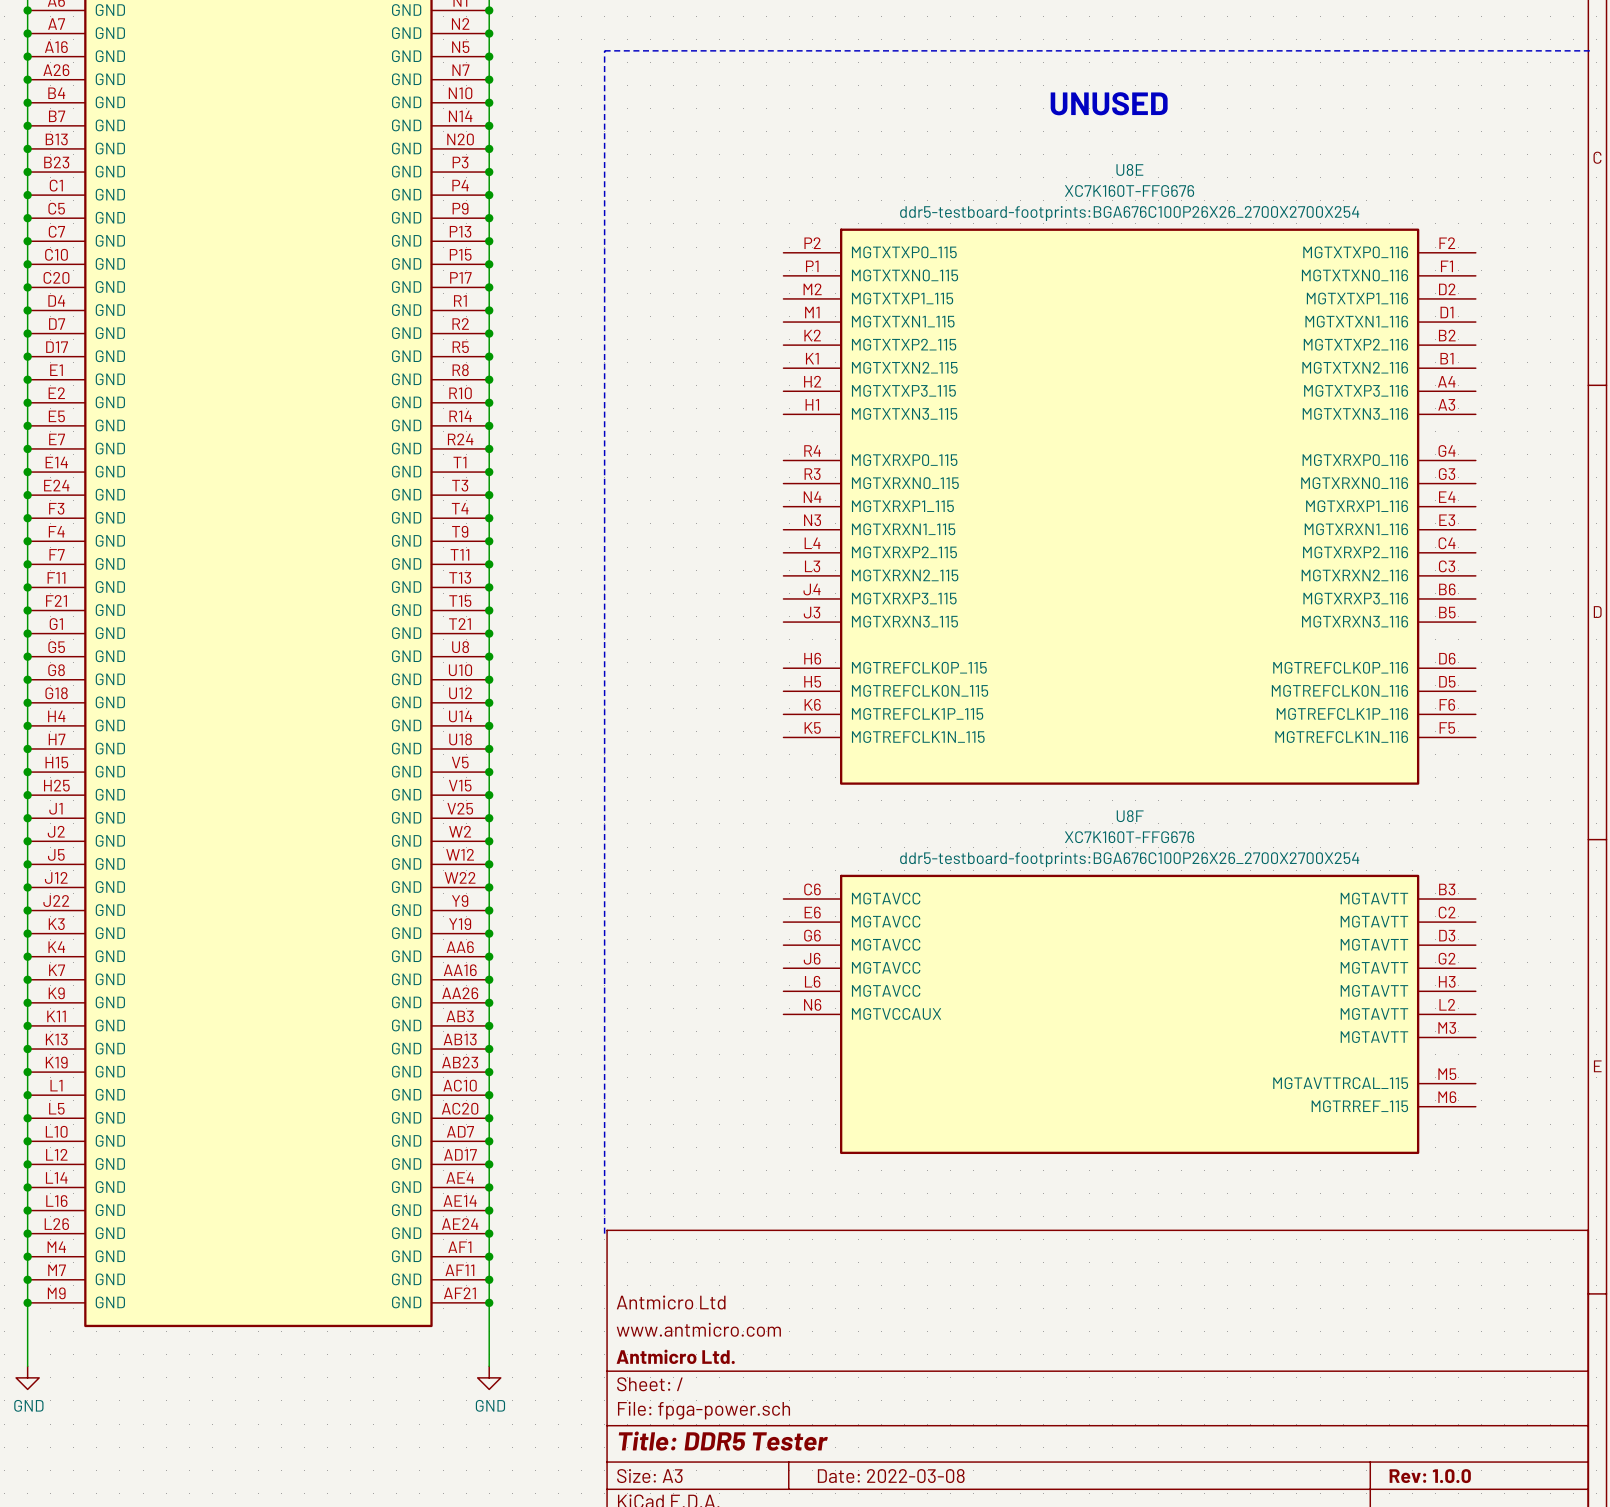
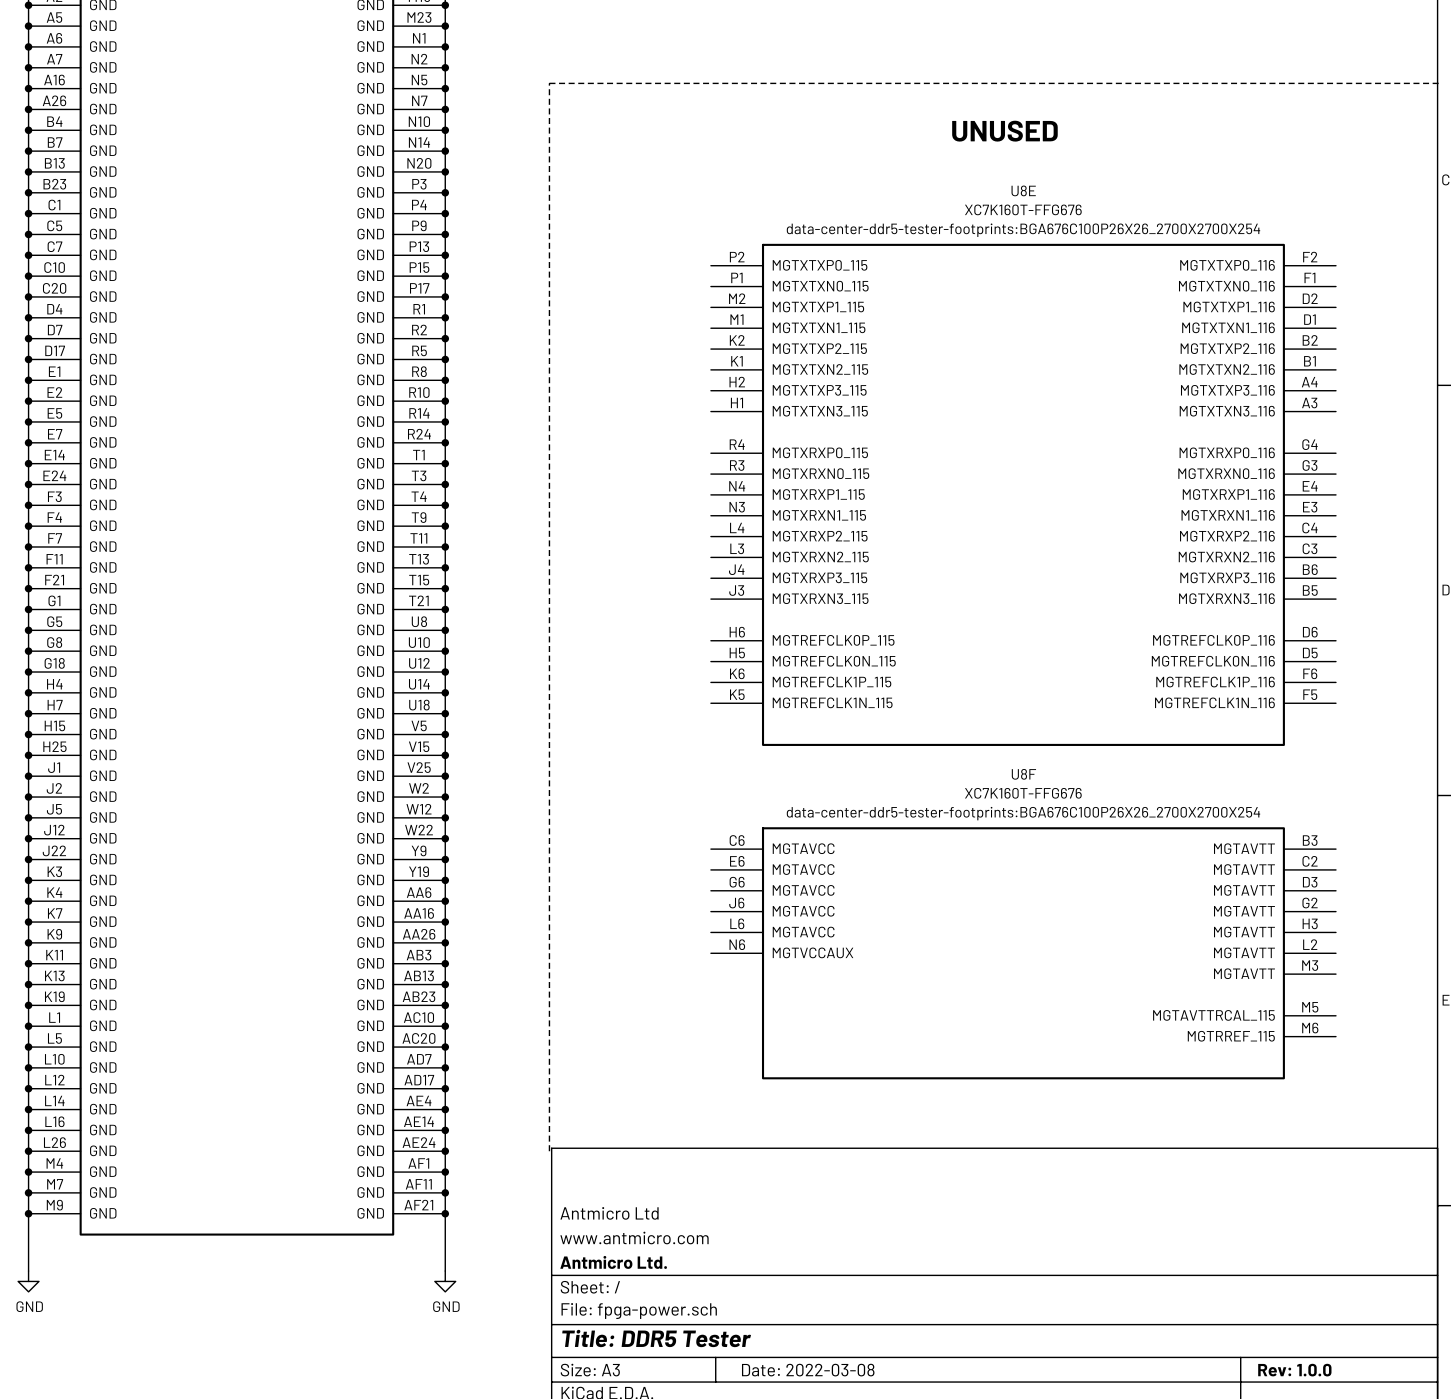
U8E text: ddr5-testboard-footprints:BGA676C100P26X26_2700X2700X254 (1129, 213) -> data-center-ddr5-tester-footprints:BGA676C100P26X26_2700X2700X254 (1023, 230)
U8F text: ddr5-testboard-footprints:BGA676C100P26X26_2700X2700X254 (1129, 859) -> data-center-ddr5-tester-footprints:BGA676C100P26X26_2700X2700X254 (1023, 813)

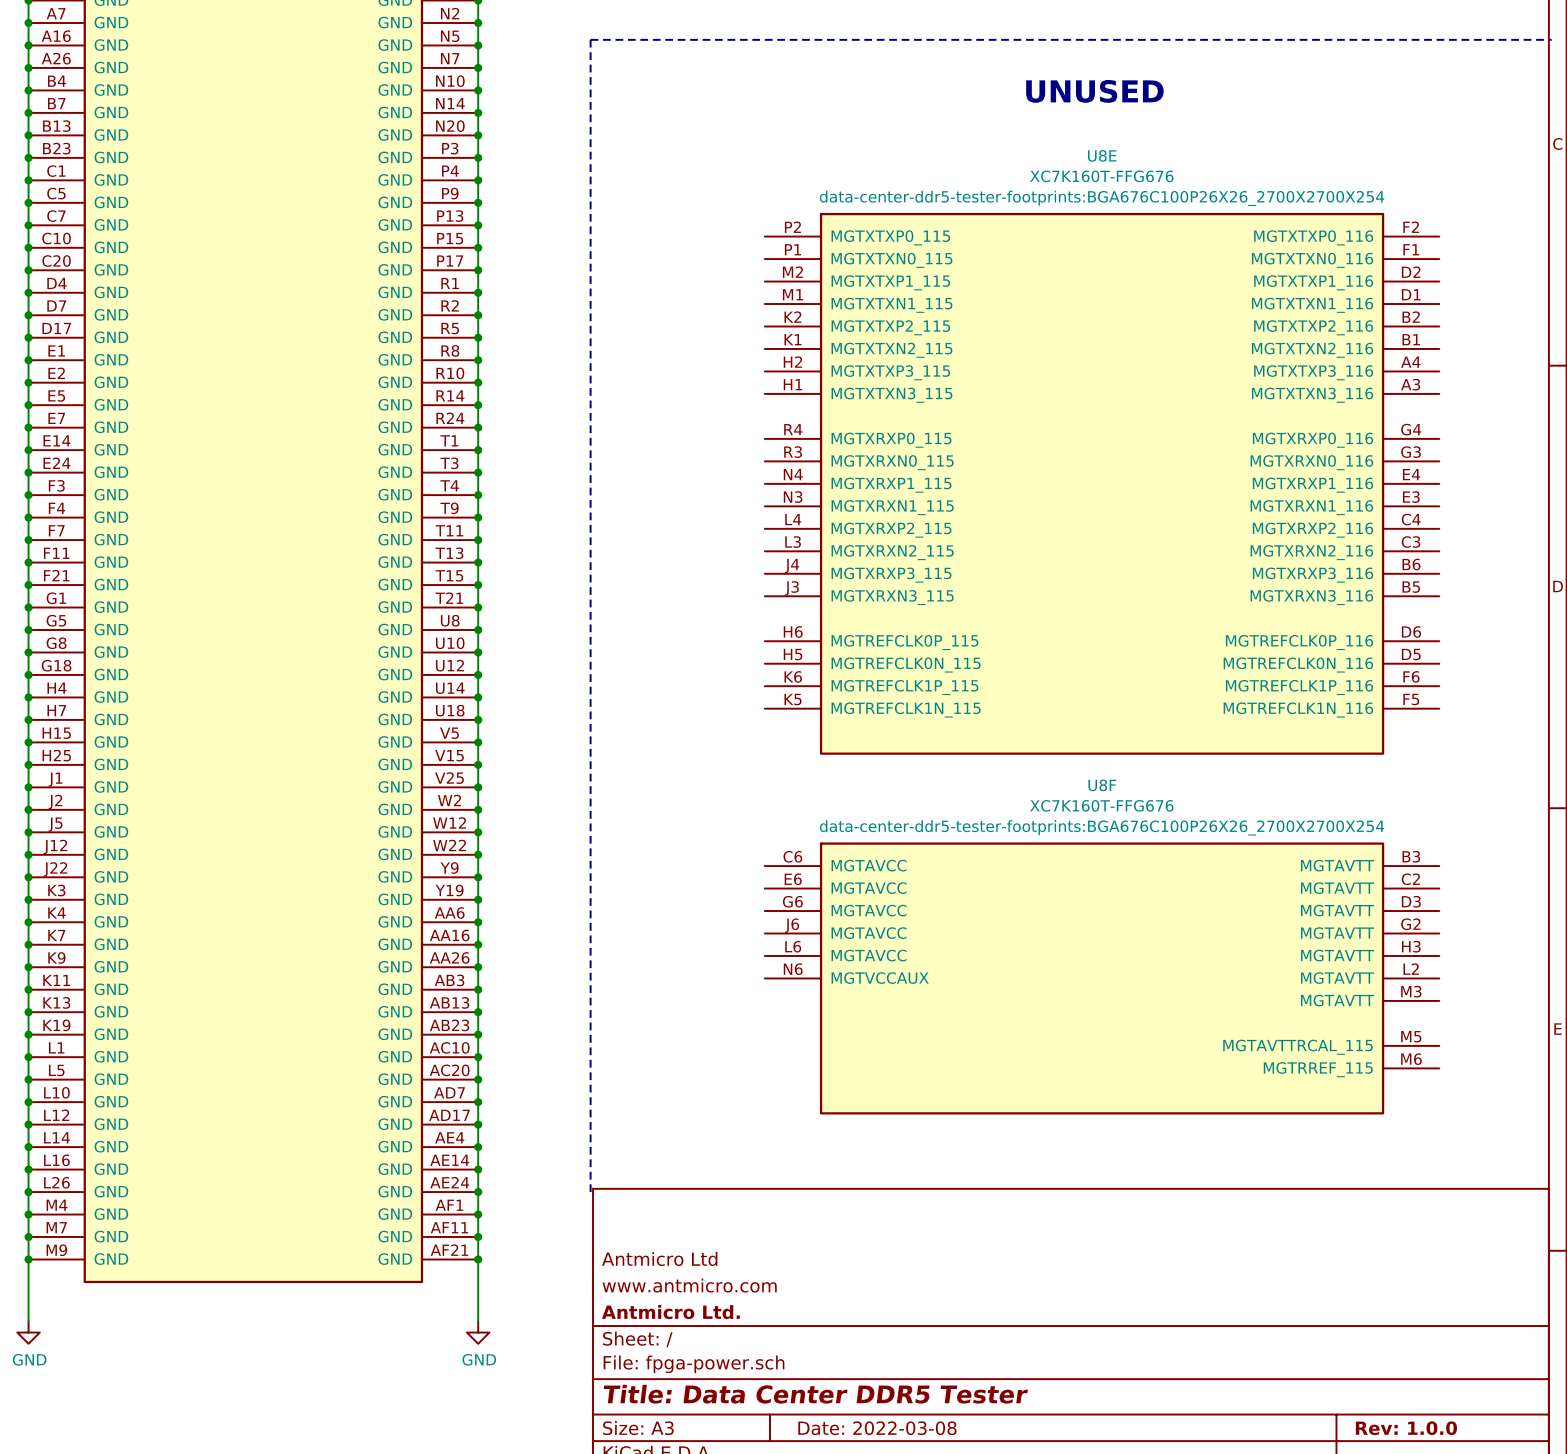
title block: Title: DDR5 Tester (656, 1338) -> Title: Data Center DDR5 Tester (815, 1394)

